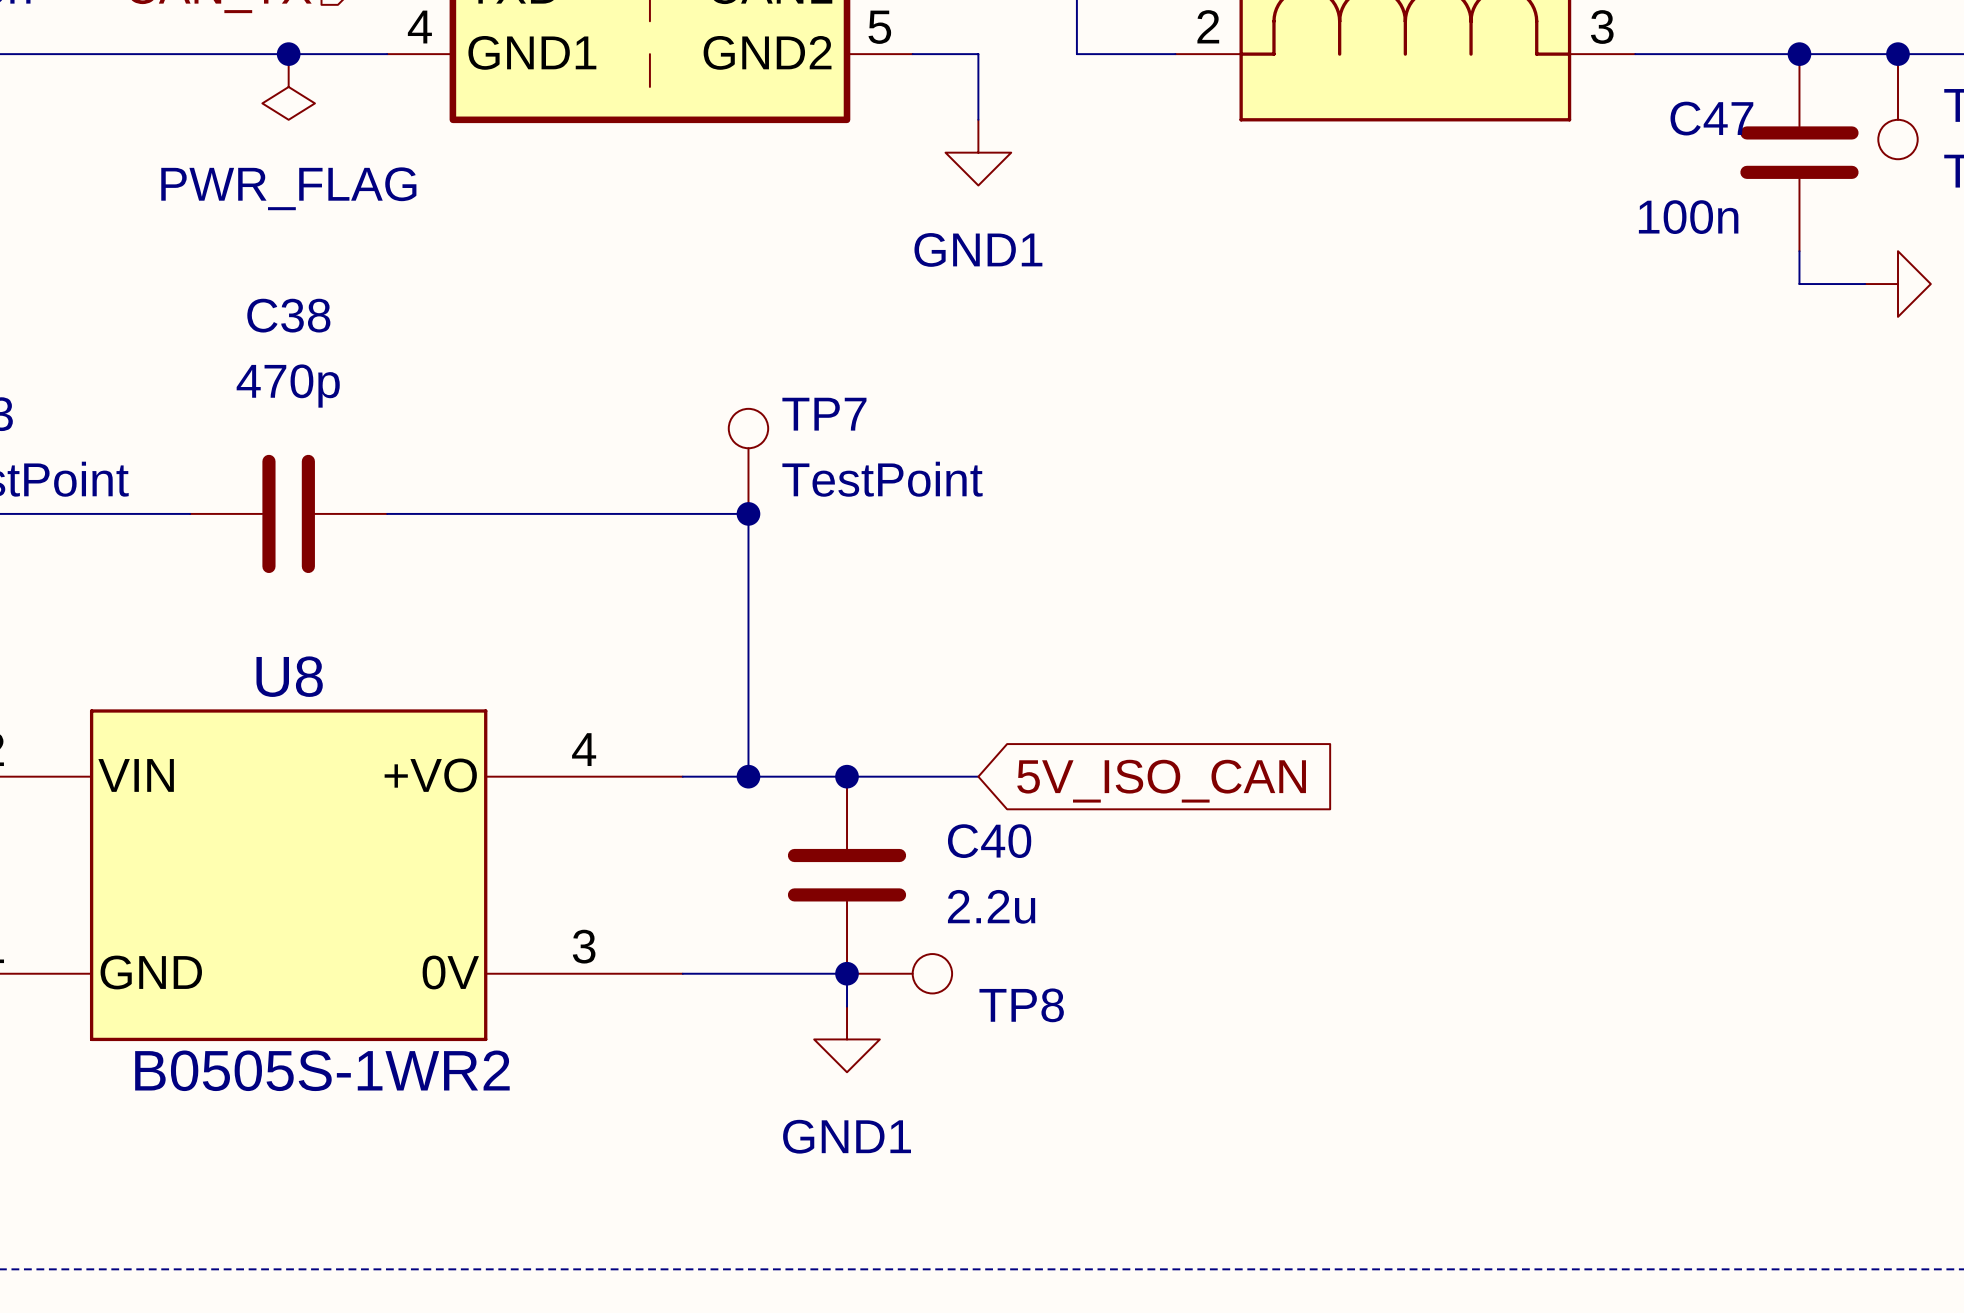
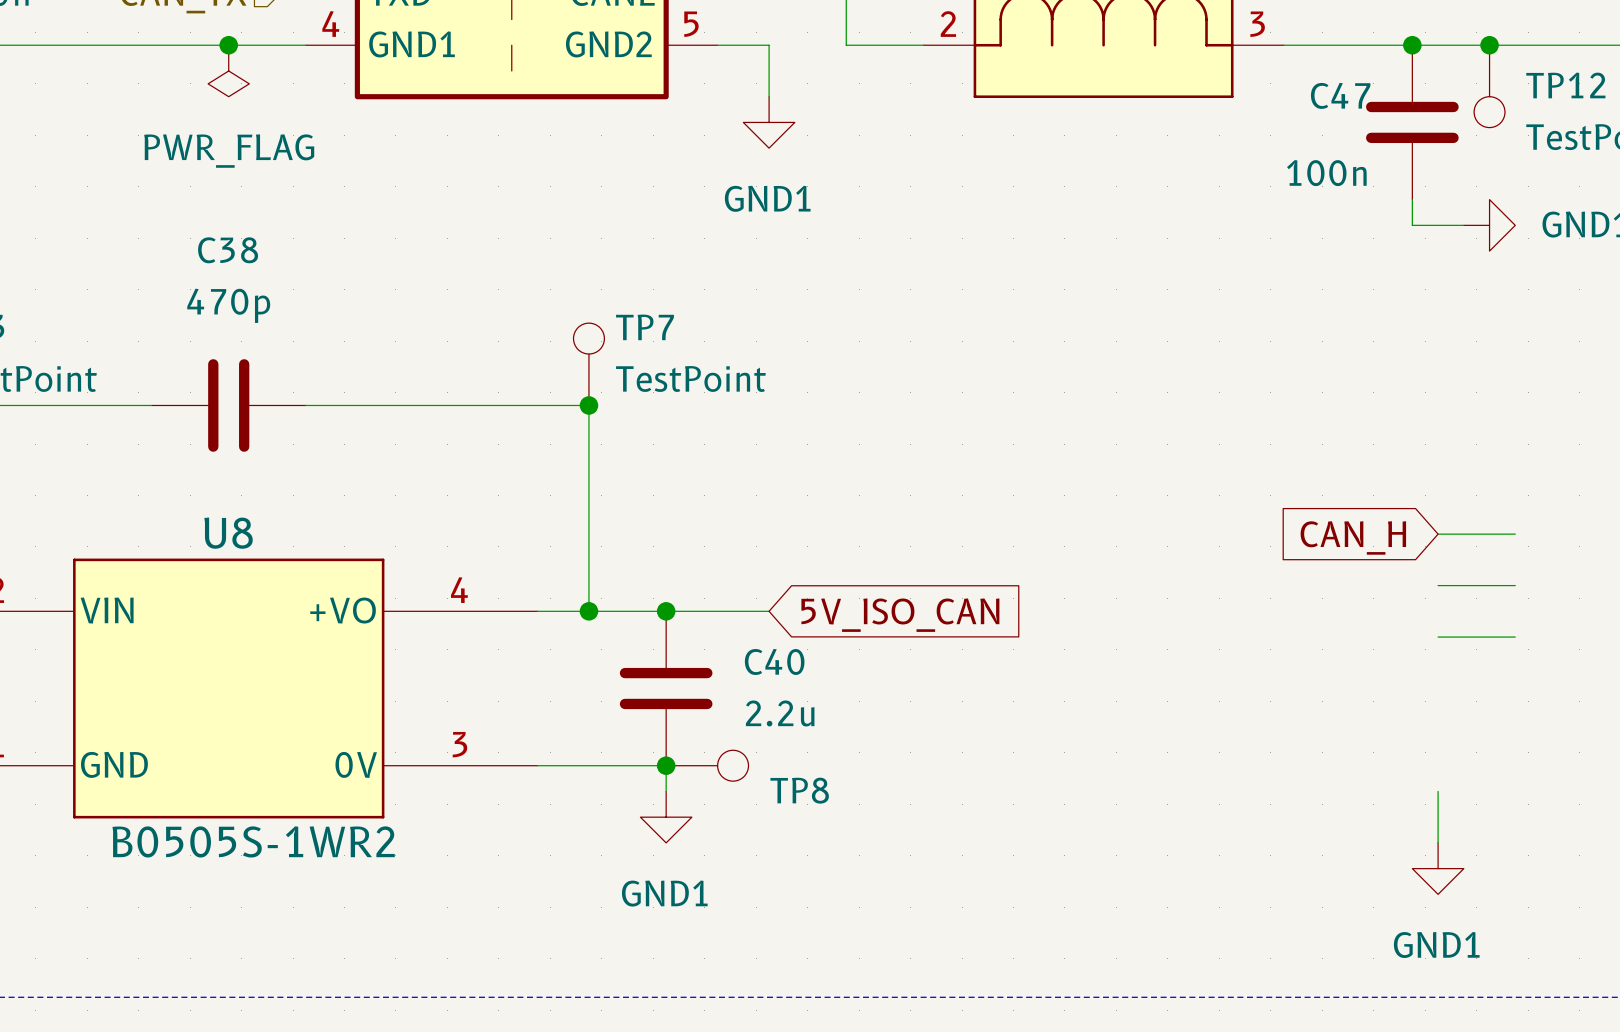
wire: none -> (1438, 534) (1515, 534)
global label: none -> CAN_H (1353, 537)
wire: none -> (1438, 585) (1515, 585)
wire: none -> (1438, 637) (1515, 637)
wire: none -> (1438, 791) (1438, 842)
power symbol: none -> GND1 (1438, 868)

